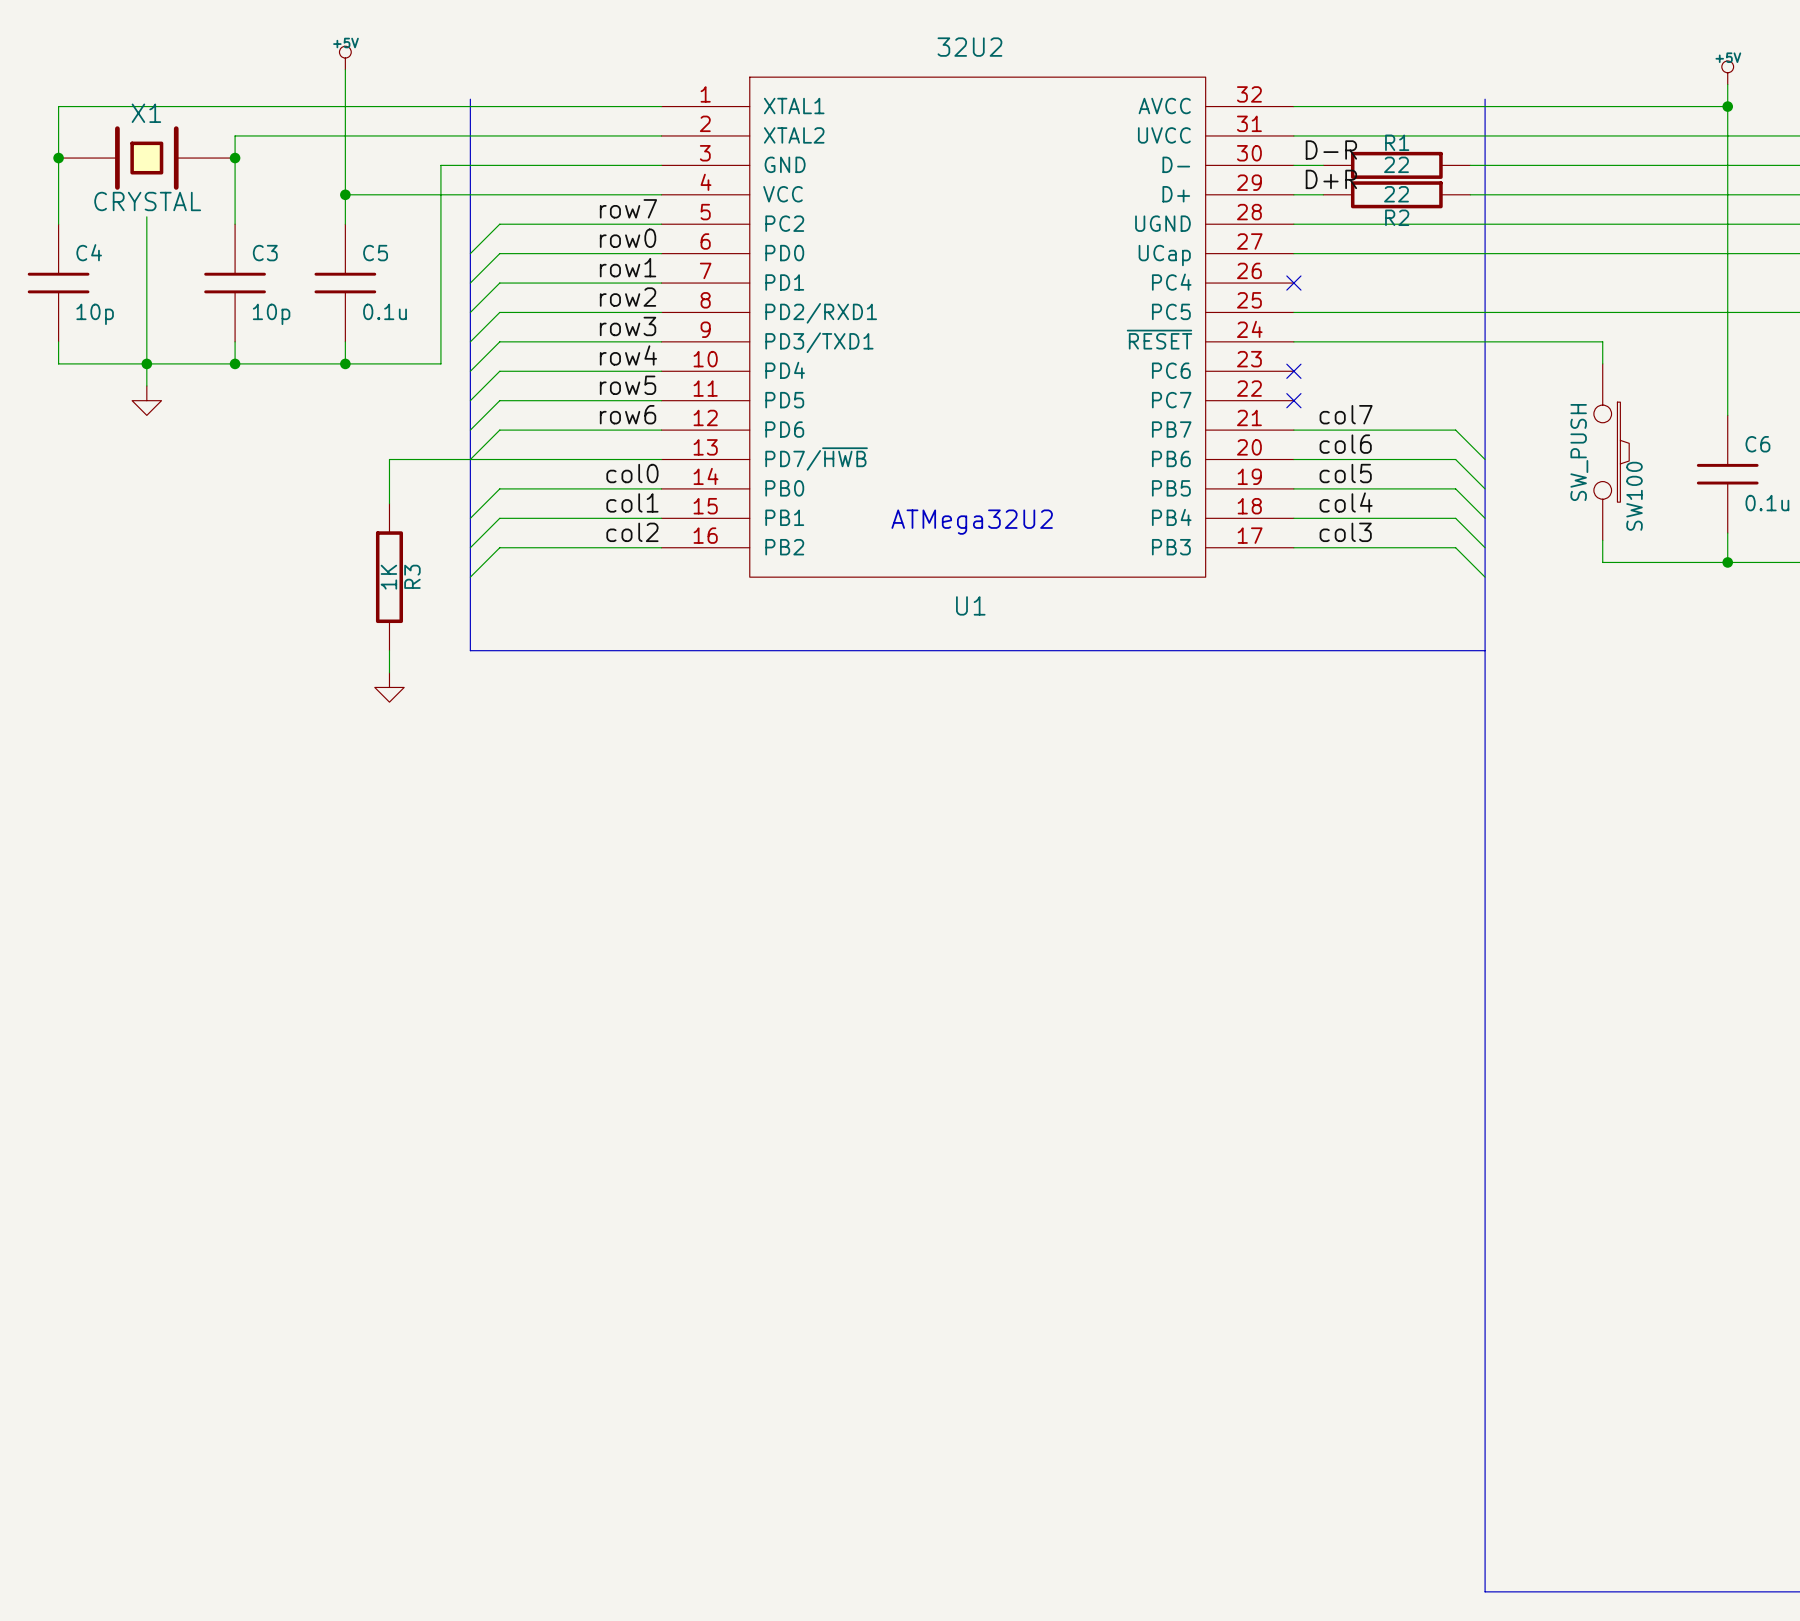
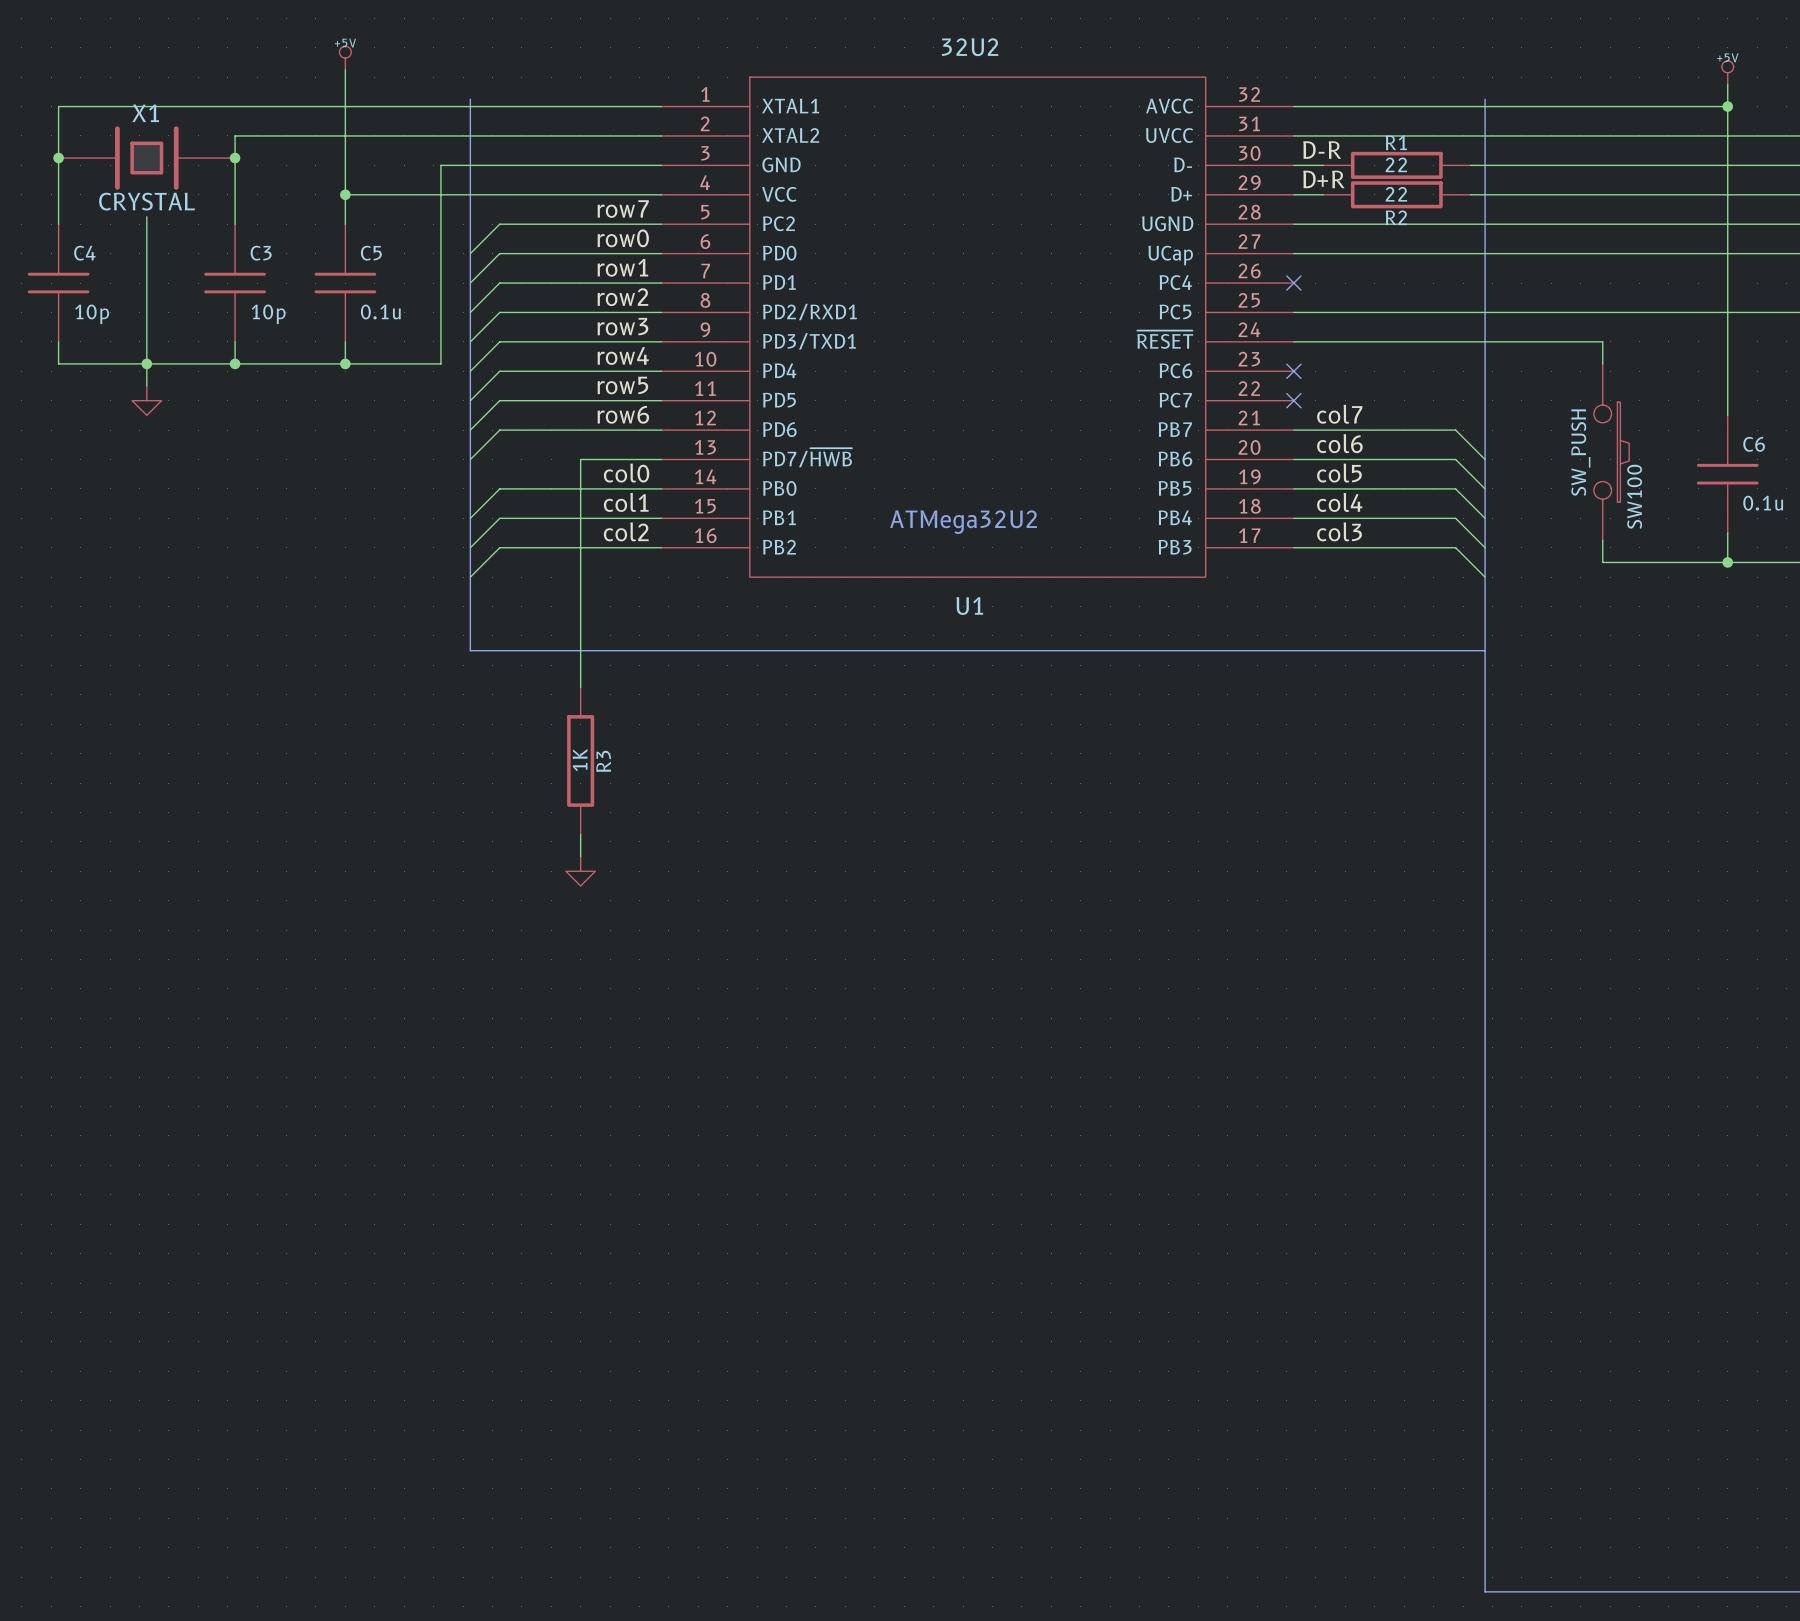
wire: (580, 459) (389, 459) (389, 503) -> (580, 459) (580, 687)
R3 position: (389, 577) -> (580, 760)
wire: (389, 650) (389, 672) -> (580, 834) (580, 856)
power symbol position: (389, 687) -> (580, 871)

